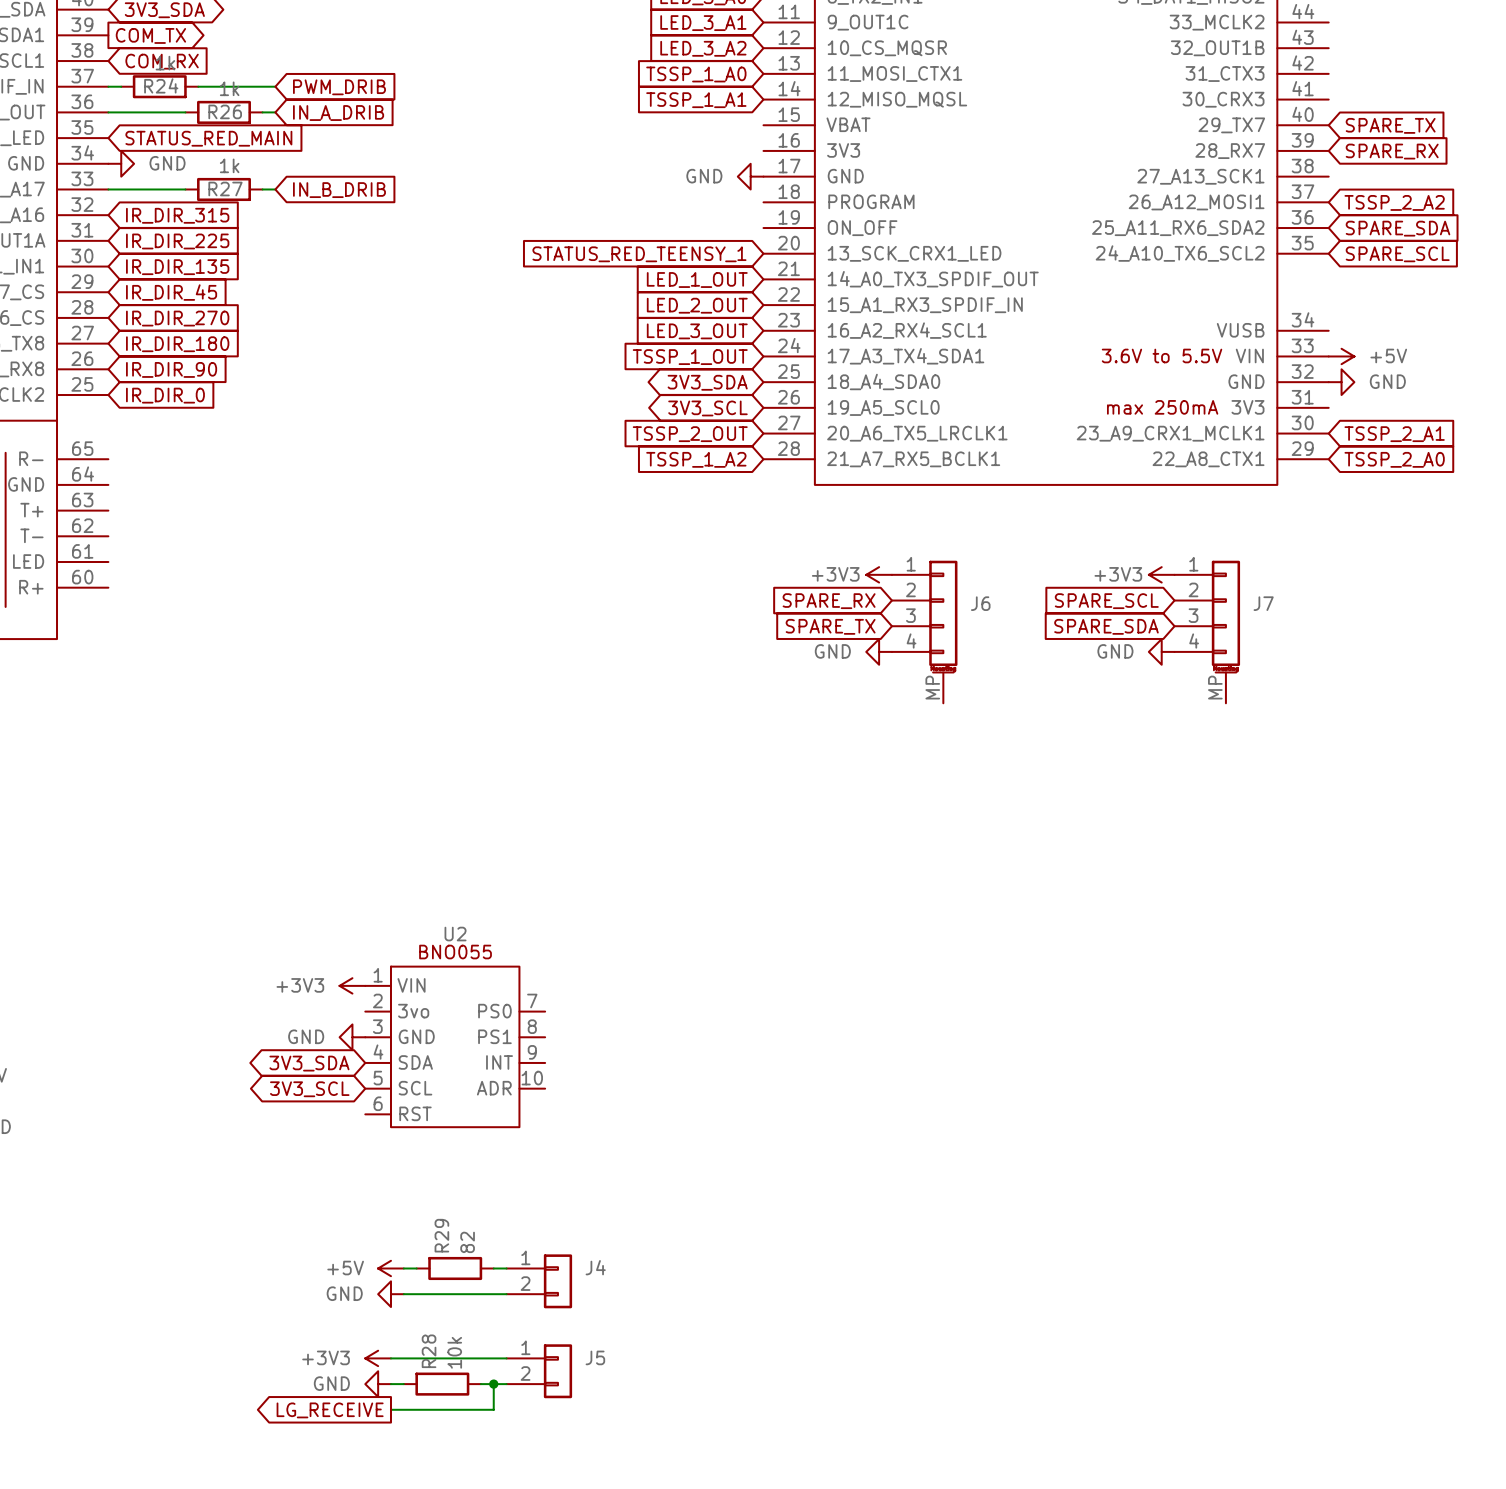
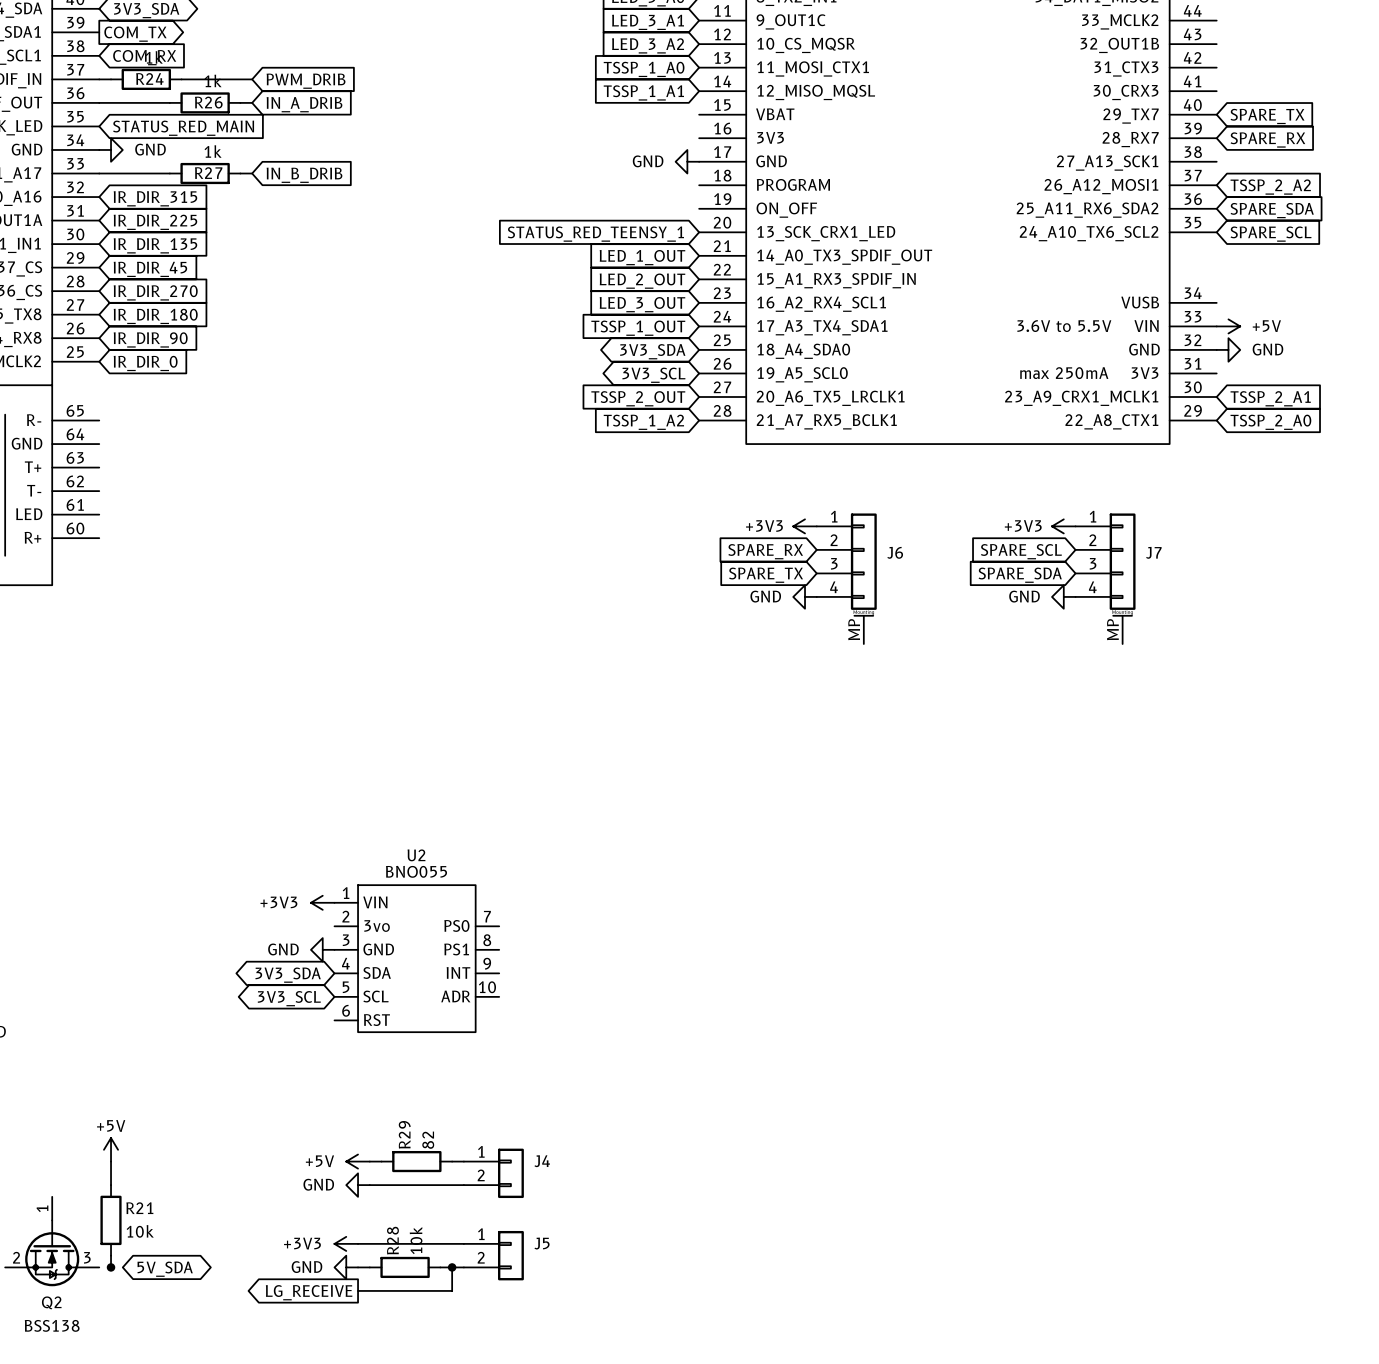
power symbol: none -> +5V (111, 1149)
wire: none -> (111, 1161) (111, 1185)
R21: none -> 10k (111, 1220)
Q2: none -> BSS138 (52, 1241)
wire: none -> (111, 1255) (111, 1267)
junction: none -> (111, 1267)
global label: none -> 5V_SDA (165, 1269)

